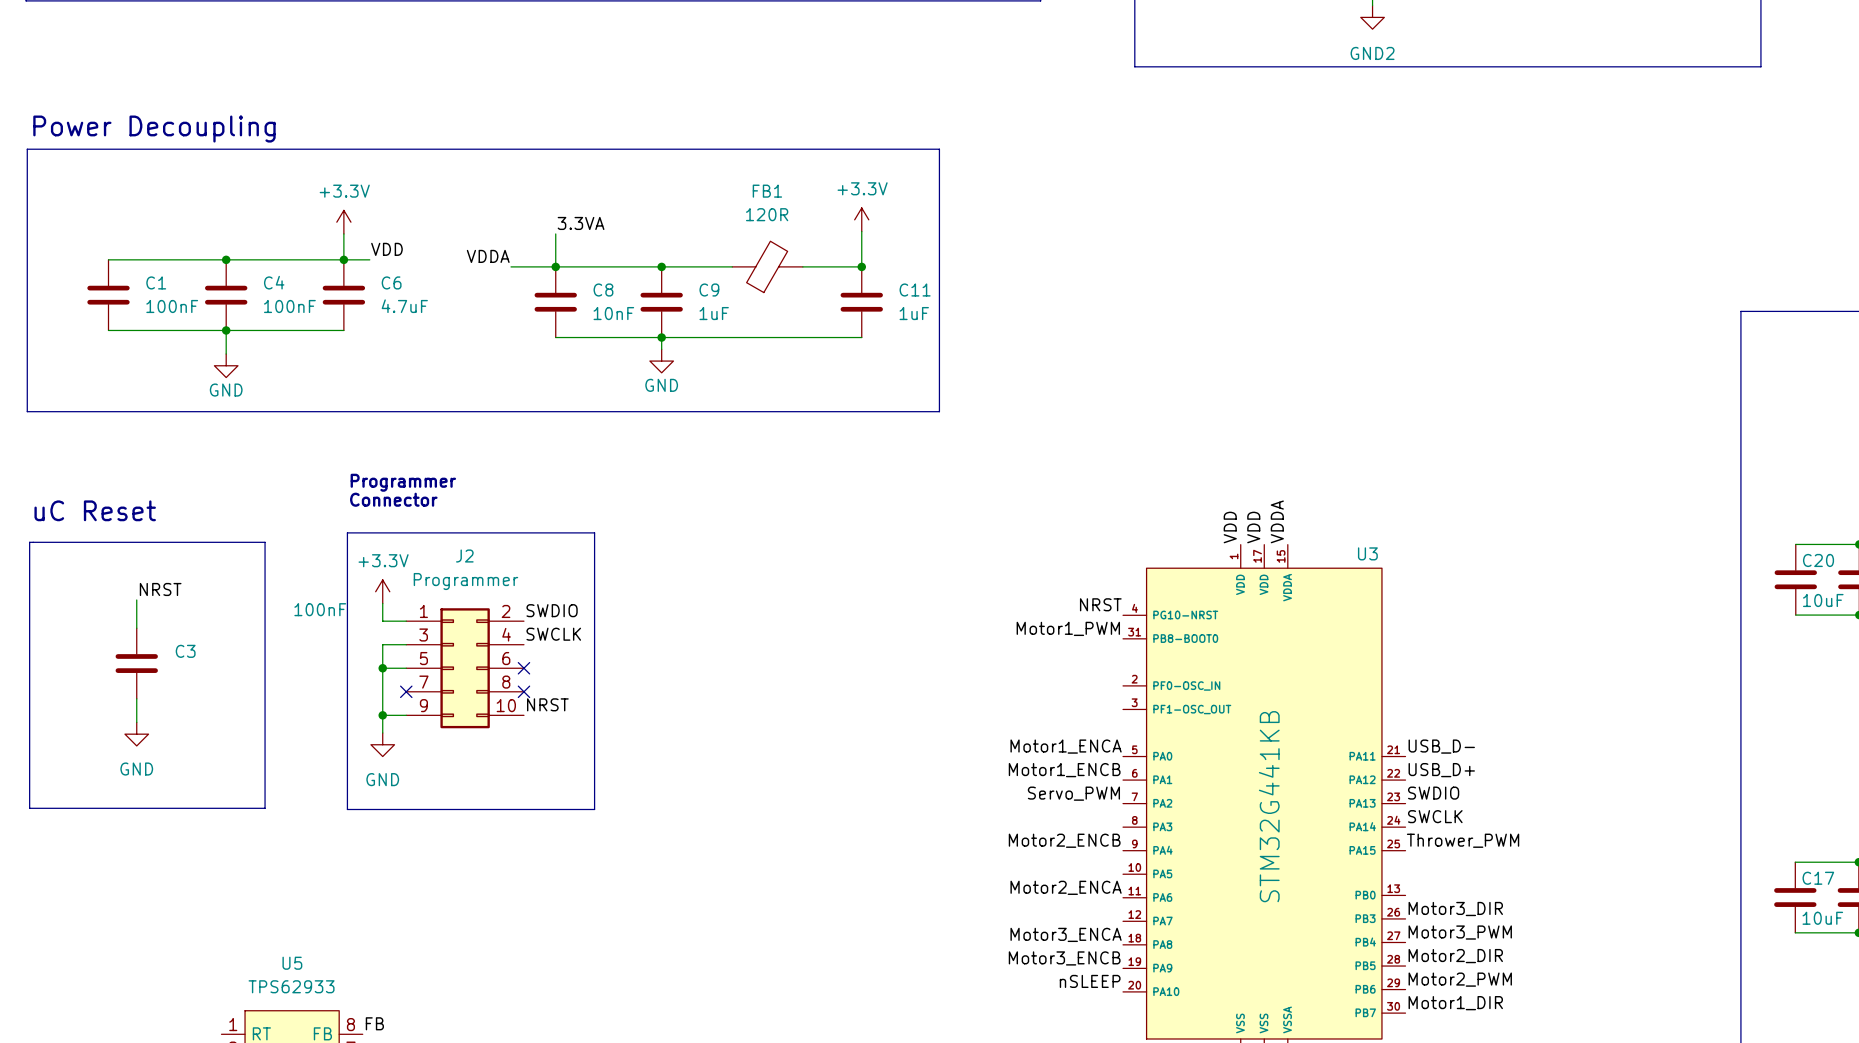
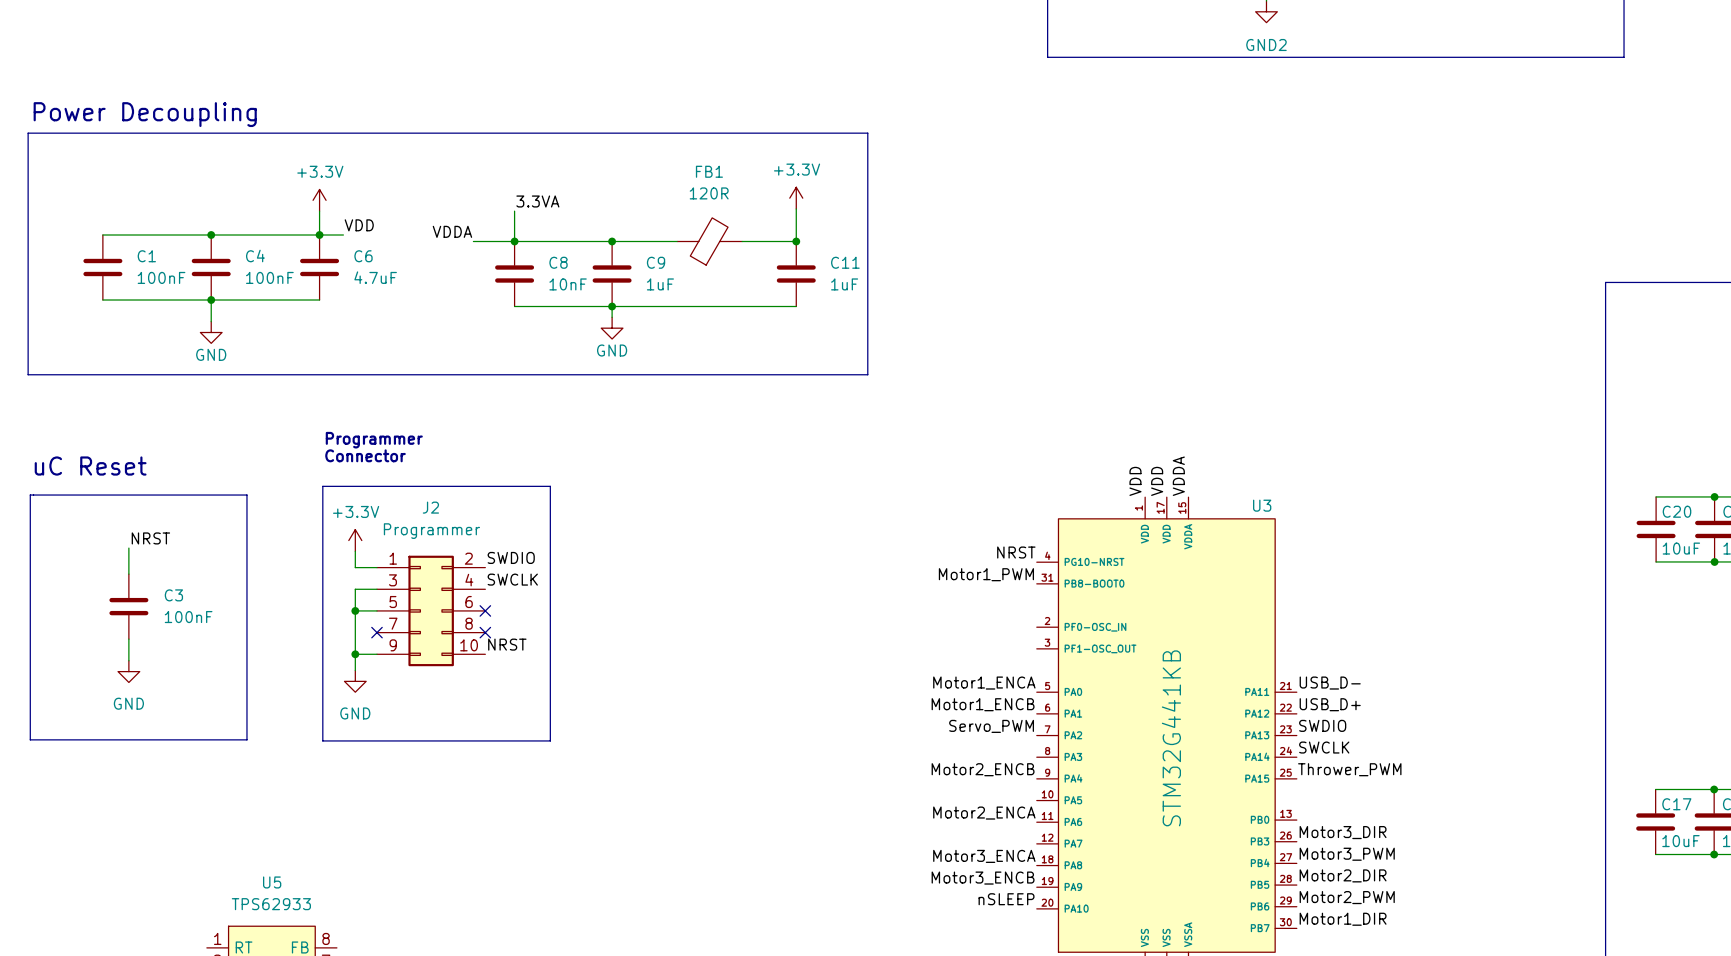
C3 value position: 100nF (320, 609) -> 100nF (188, 617)
label: FB (374, 1023) -> none

